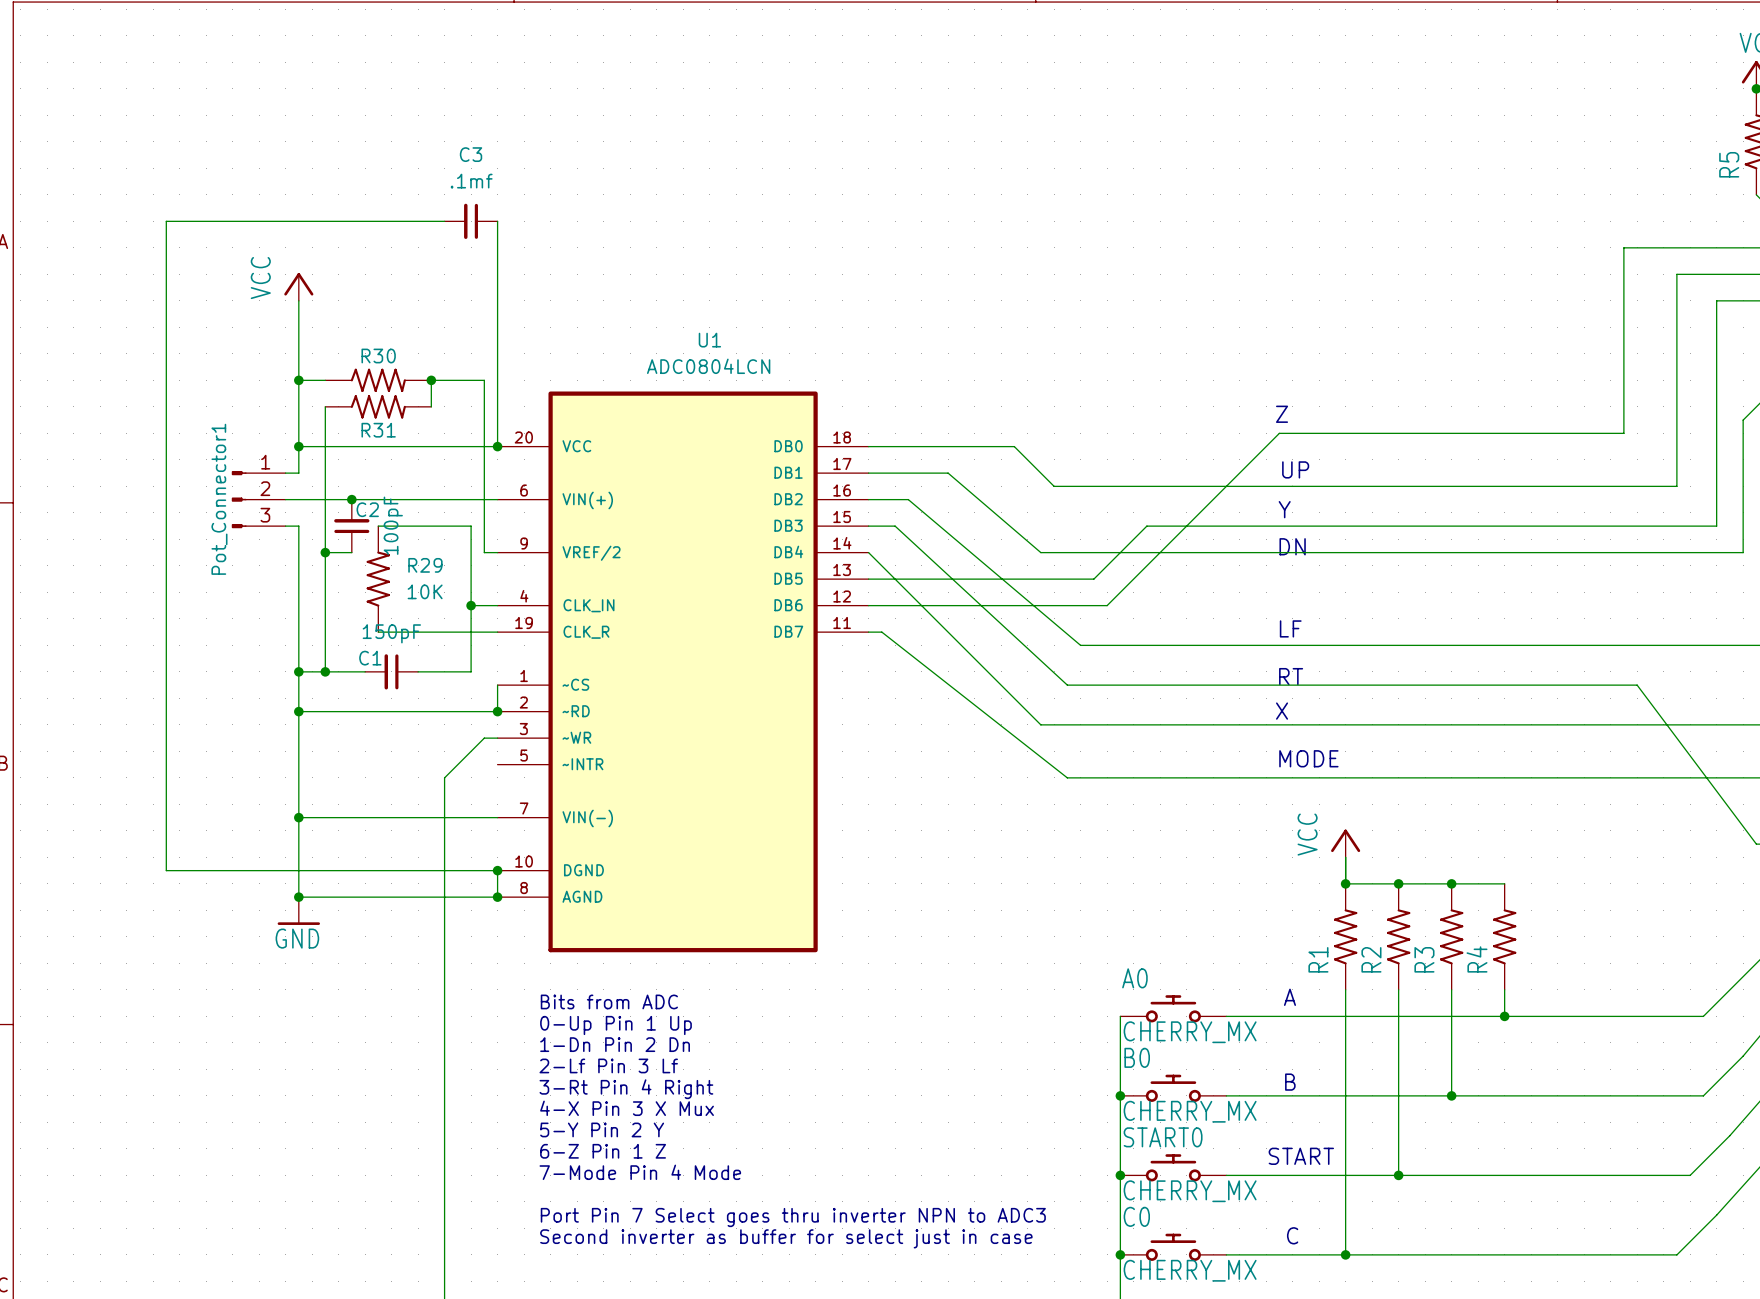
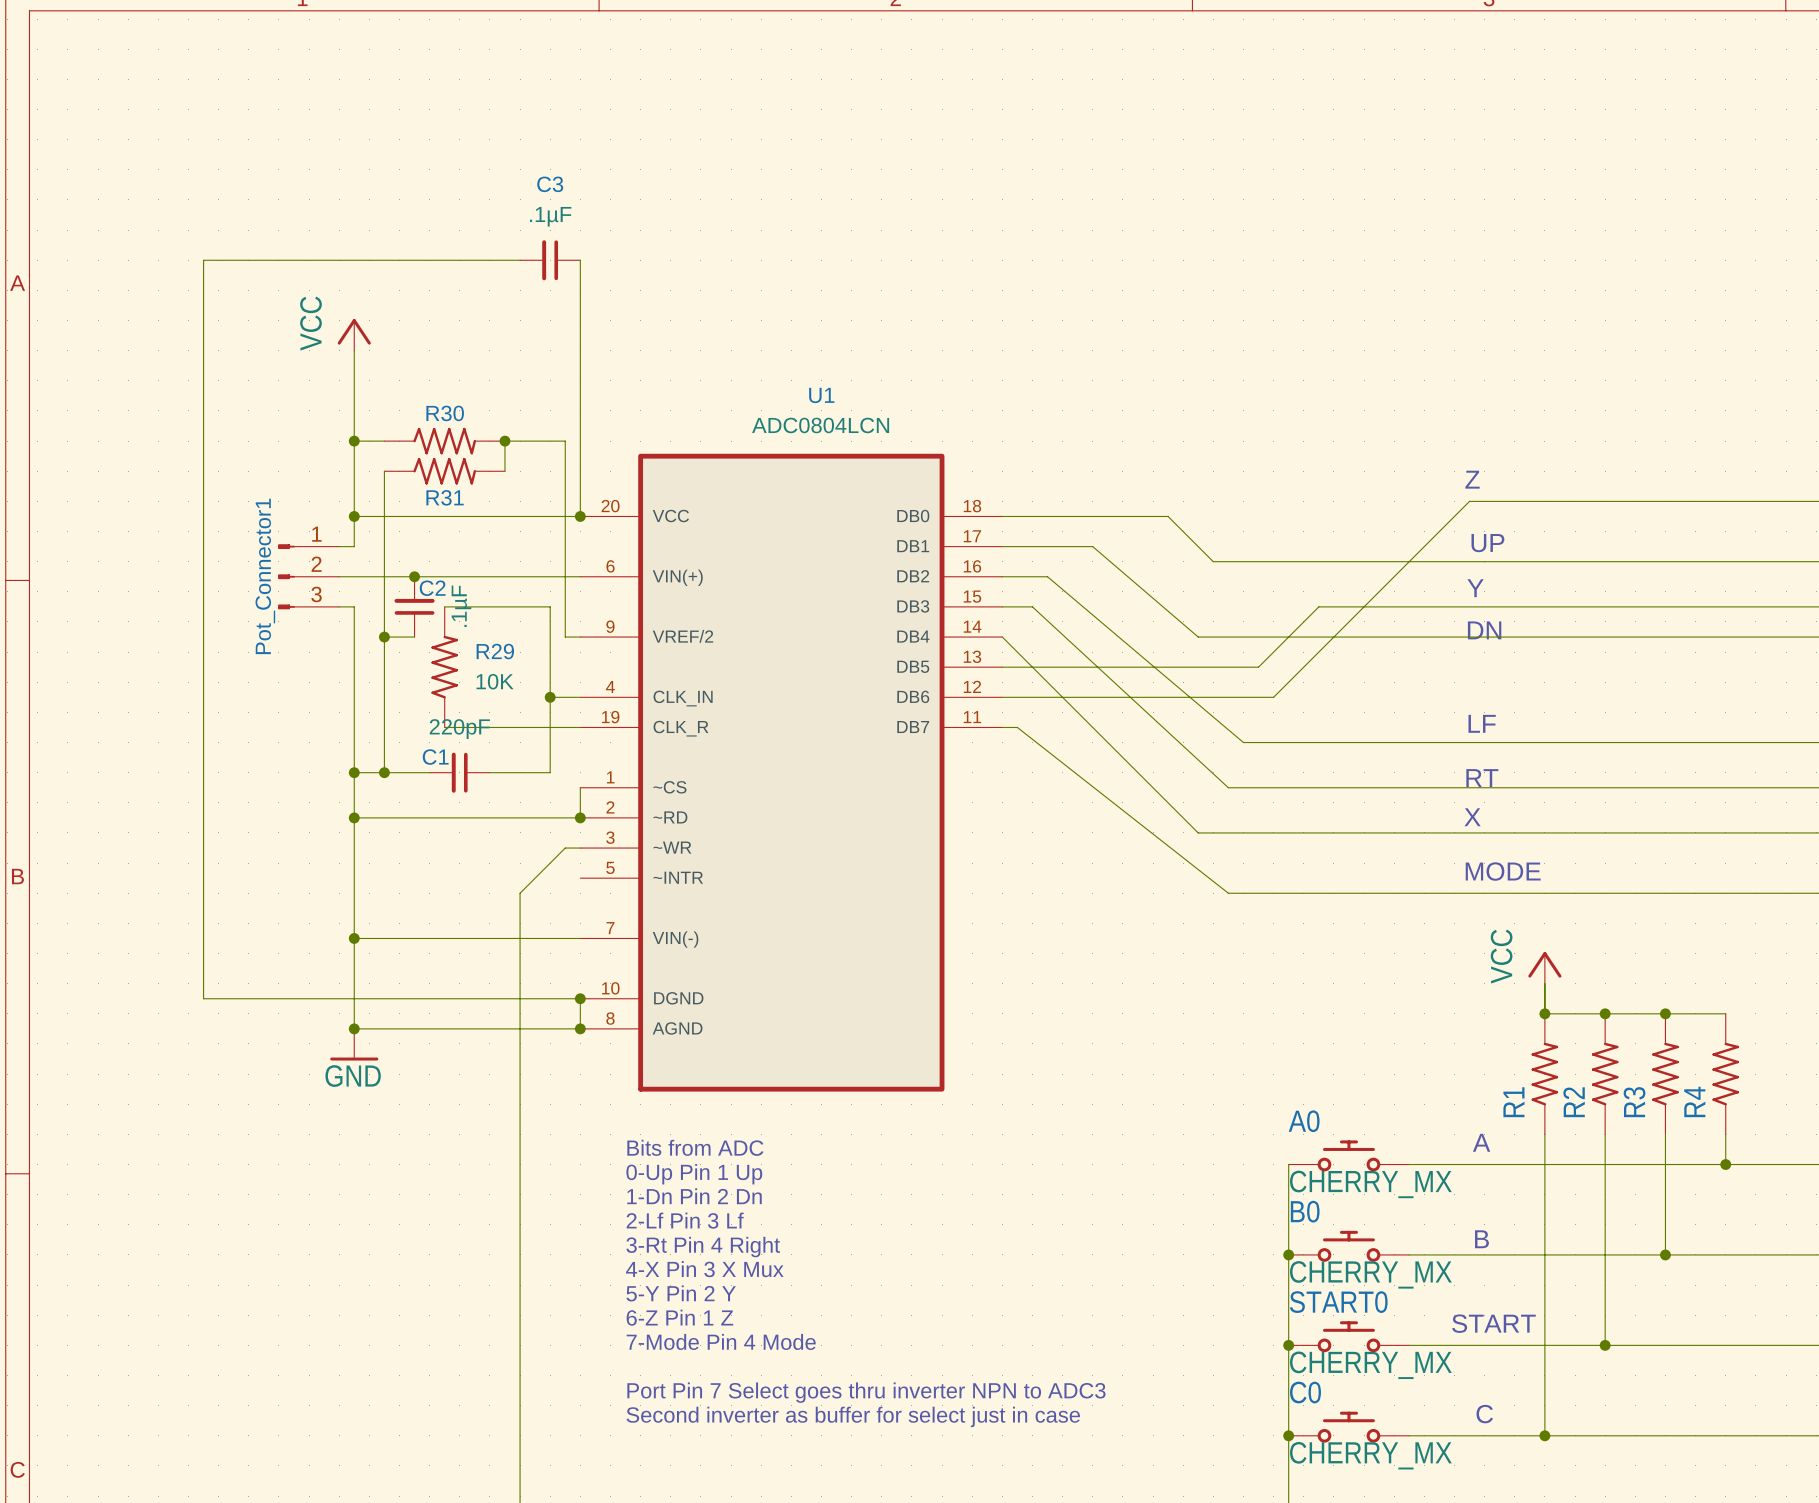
C3 value: .1mf (471, 181) -> .1µF (550, 216)
C2 value: 100pF (393, 525) -> .1µF (461, 606)
C1 value: 150pF (391, 633) -> 220pF (459, 729)

